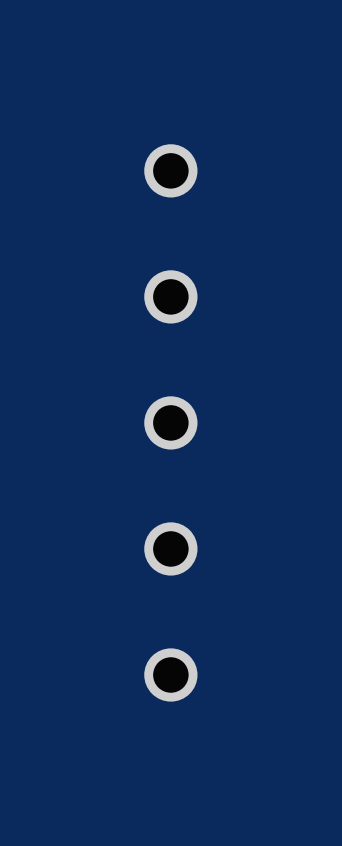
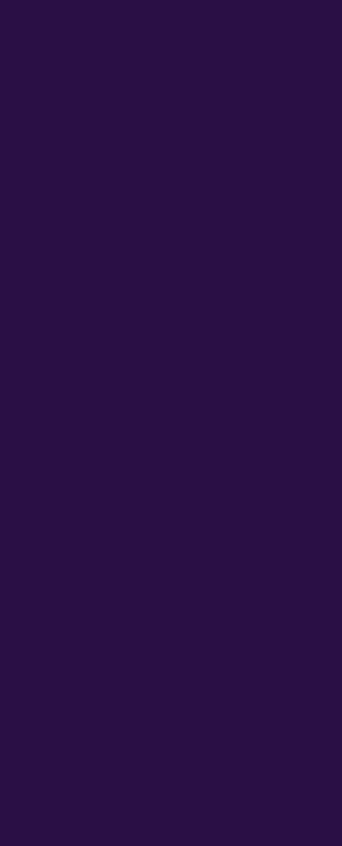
part: (170, 170) -> none
part: (170, 296) -> none
part: (170, 422) -> none
part: (170, 548) -> none
part: (170, 674) -> none

